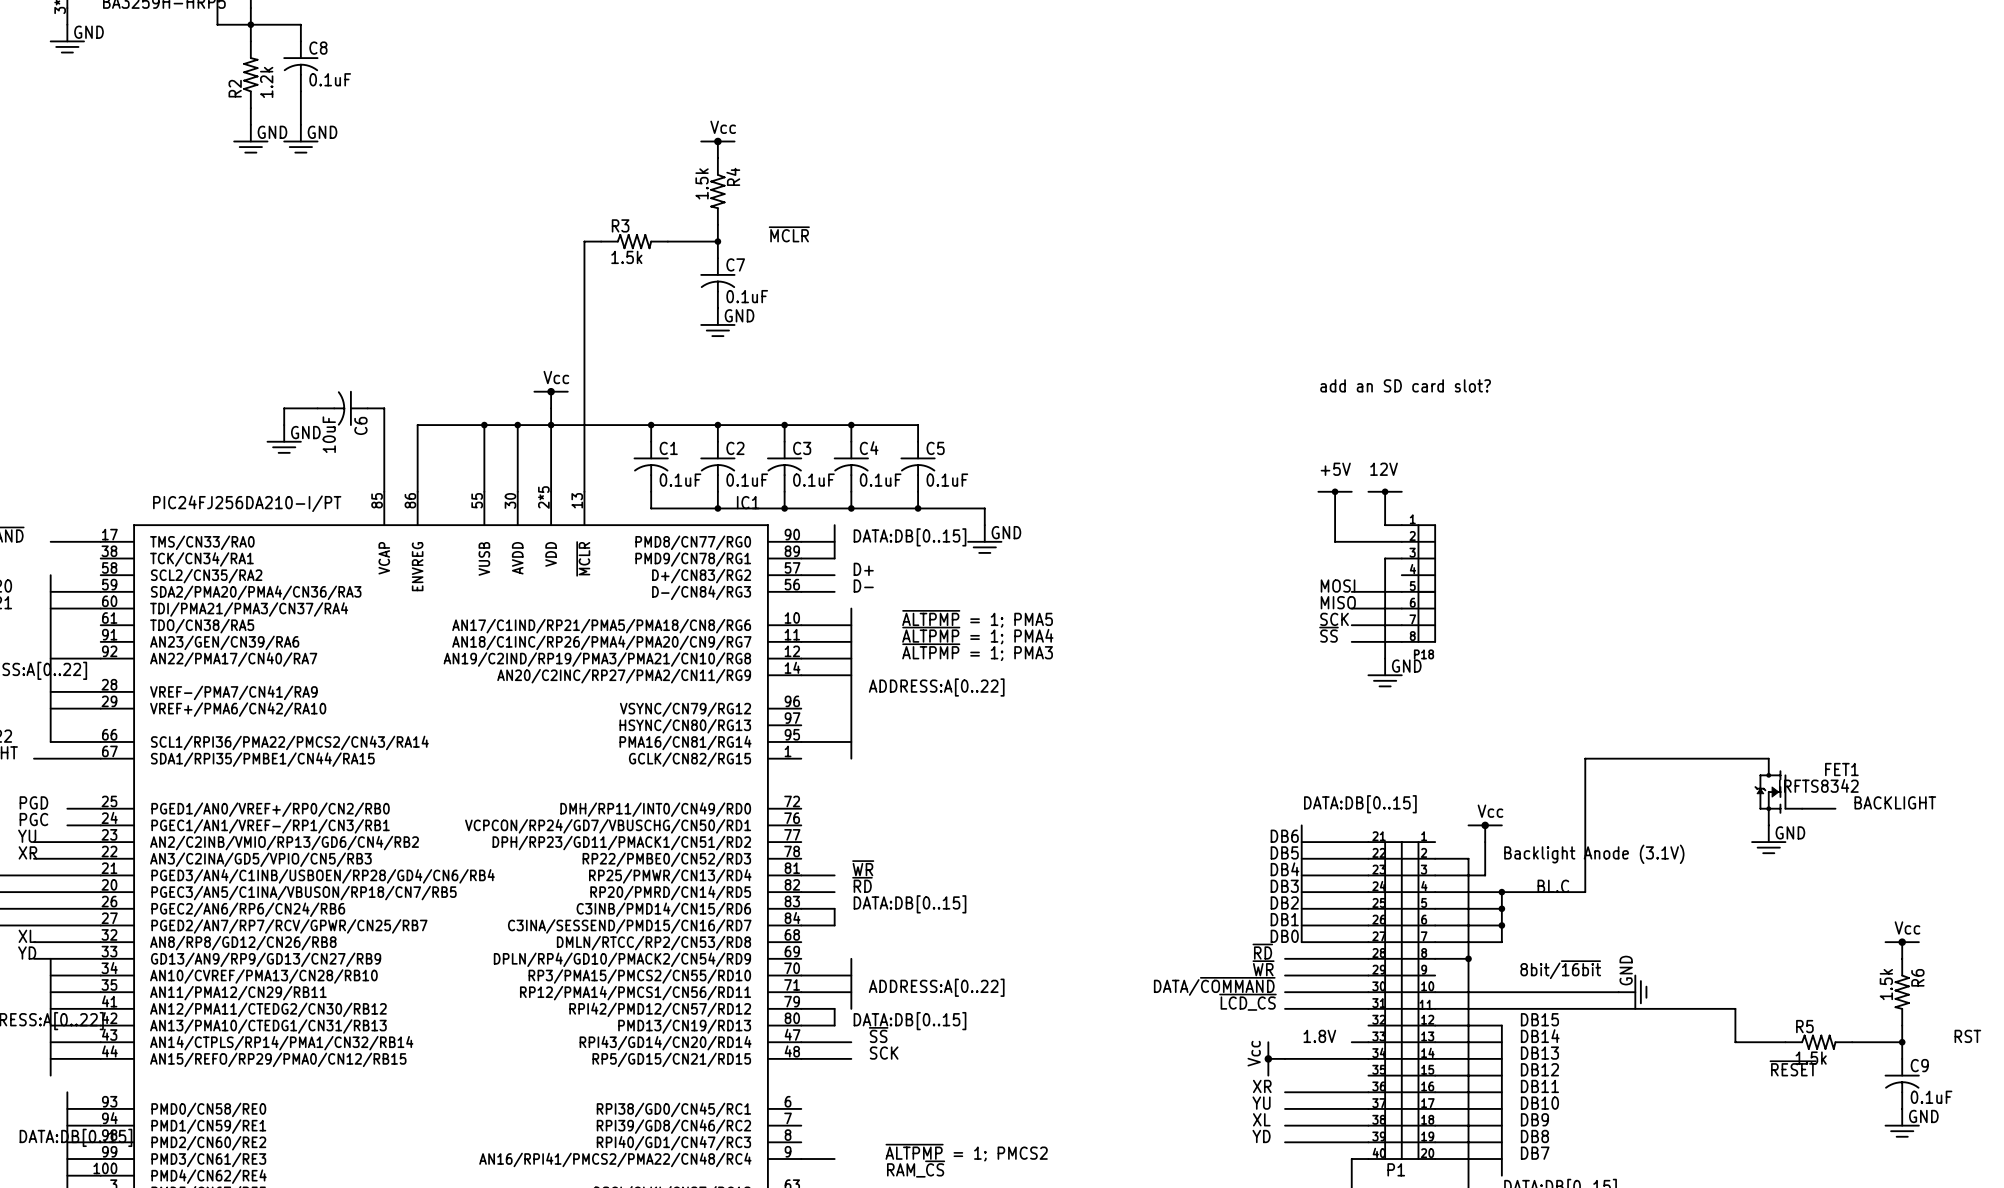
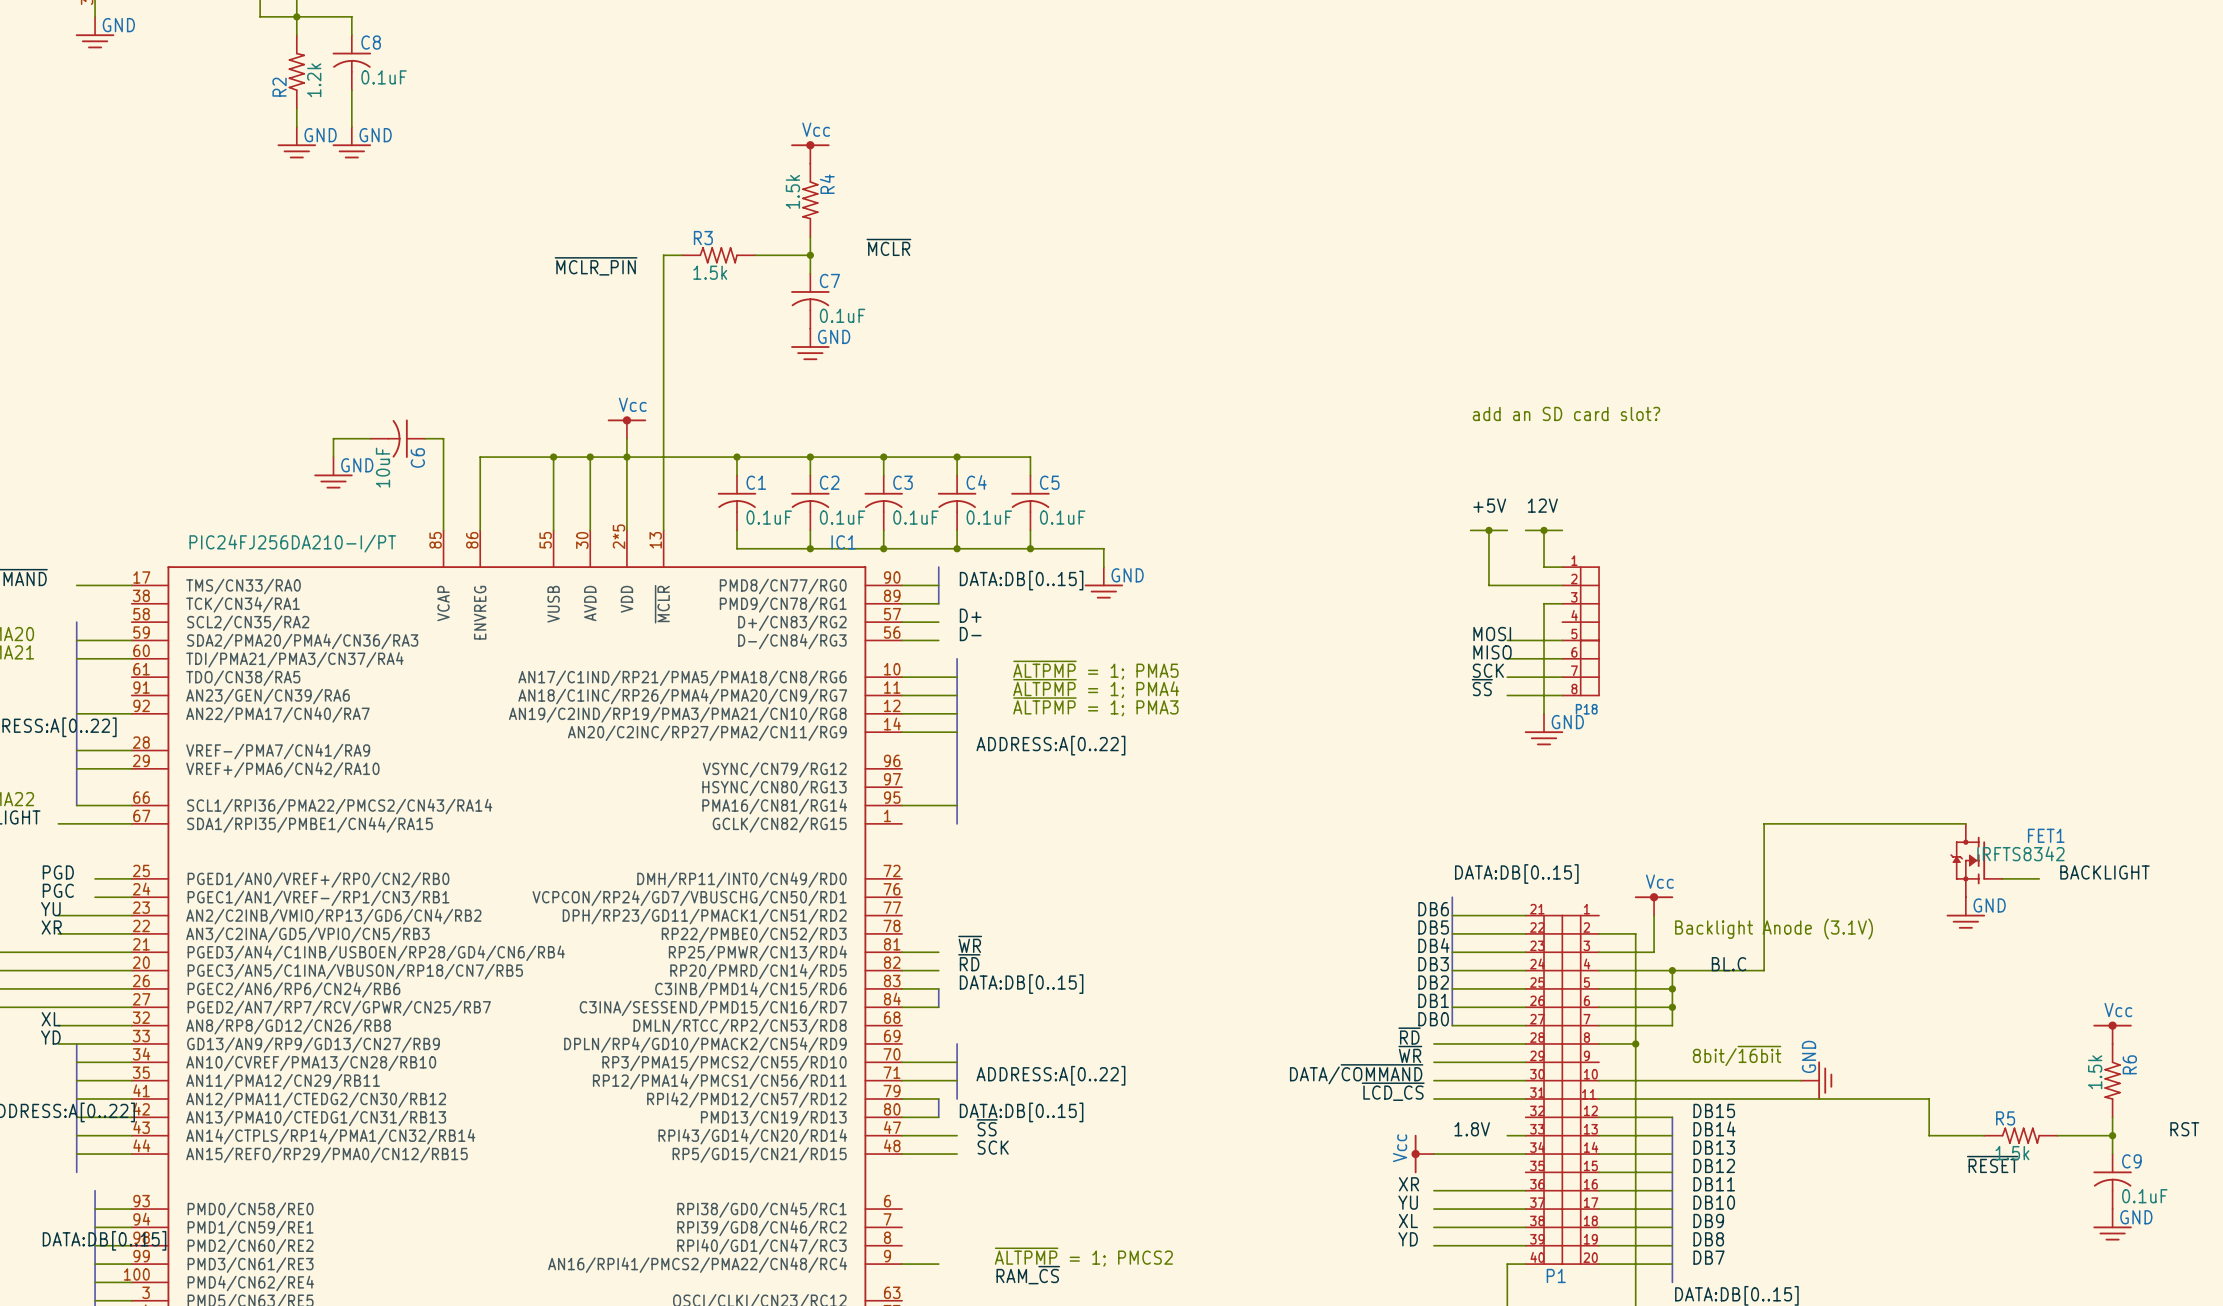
label: none -> ~{MCLR_PIN} (596, 266)

